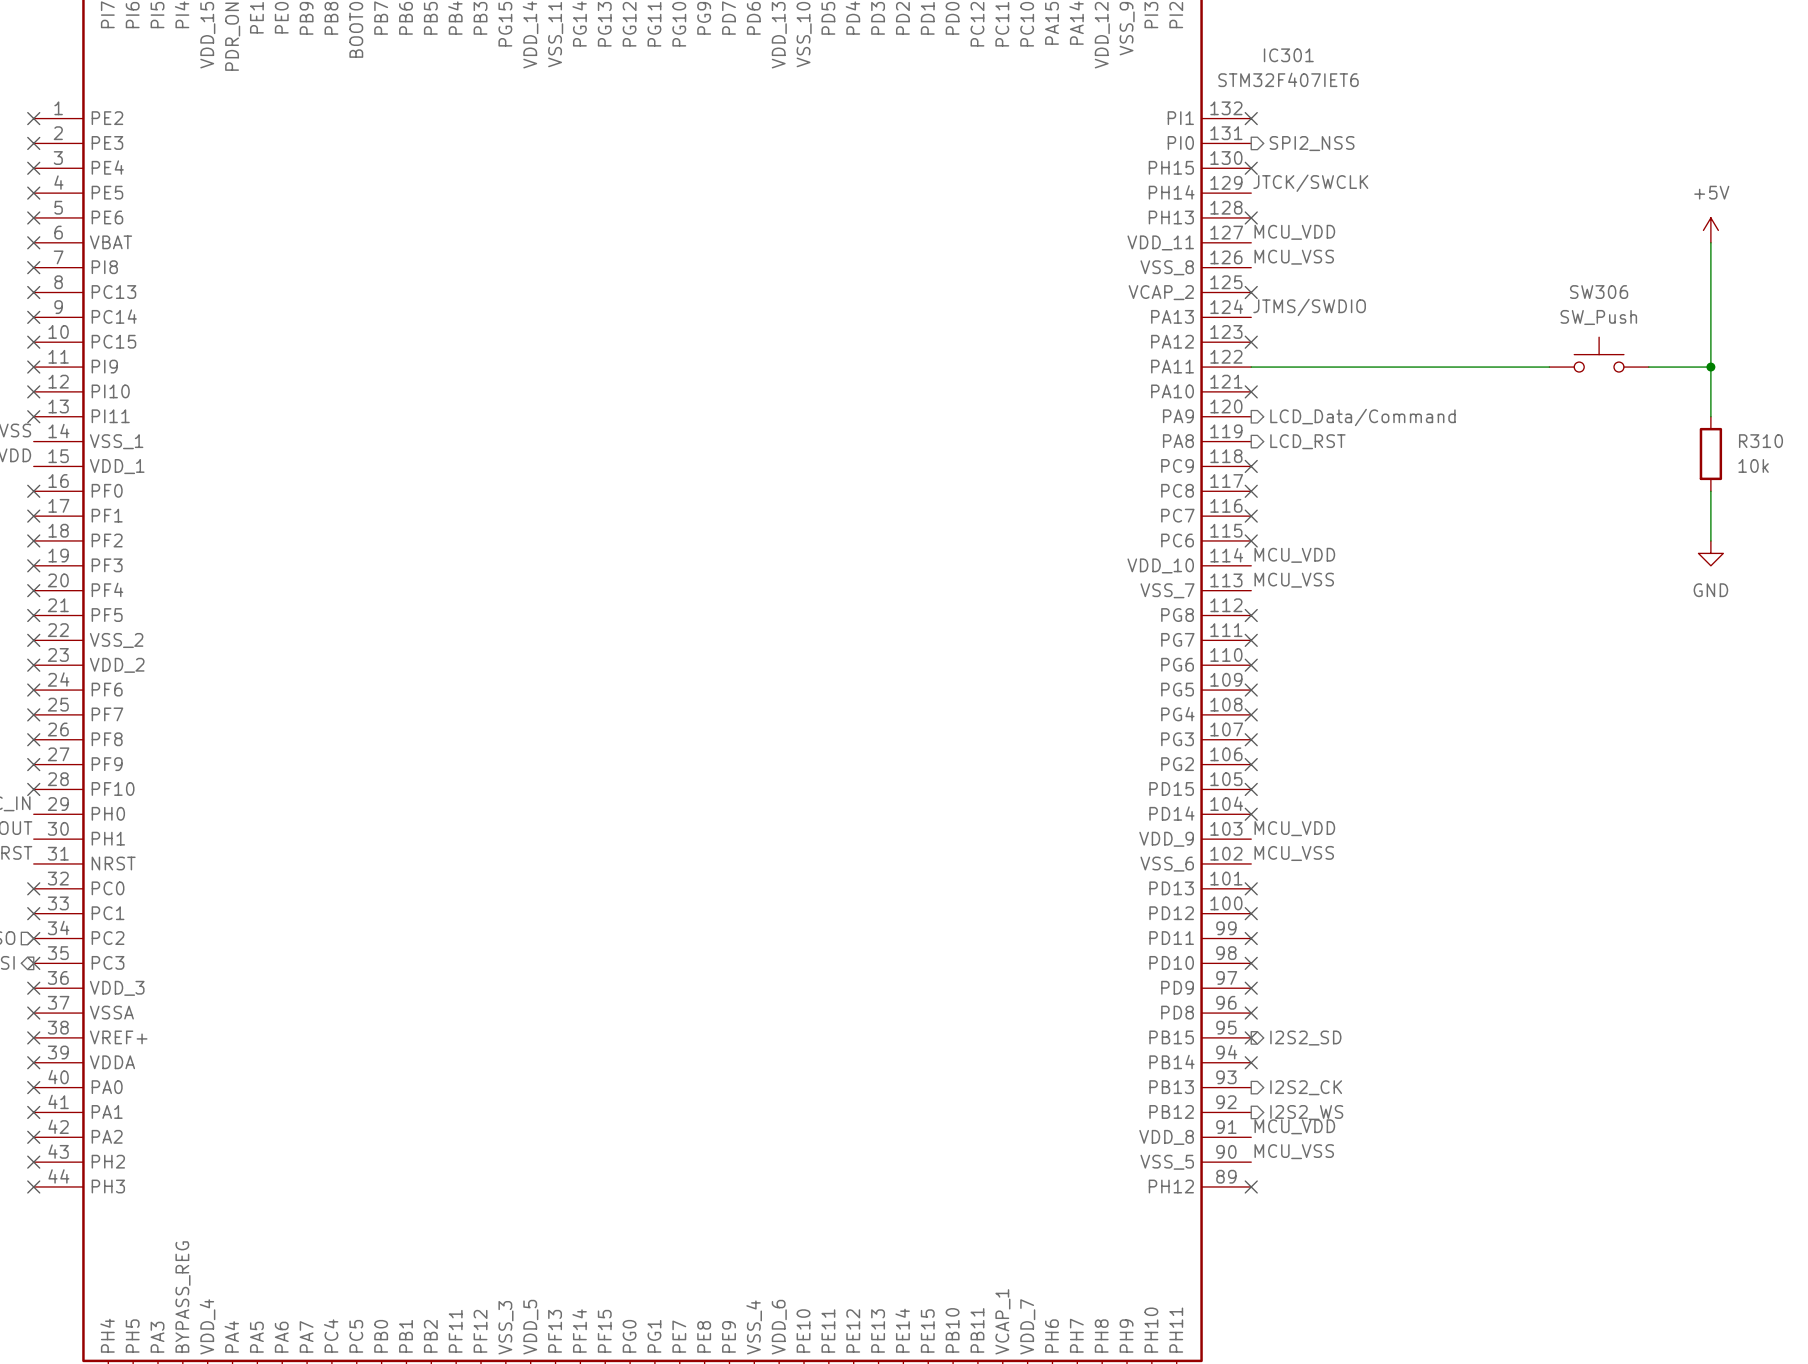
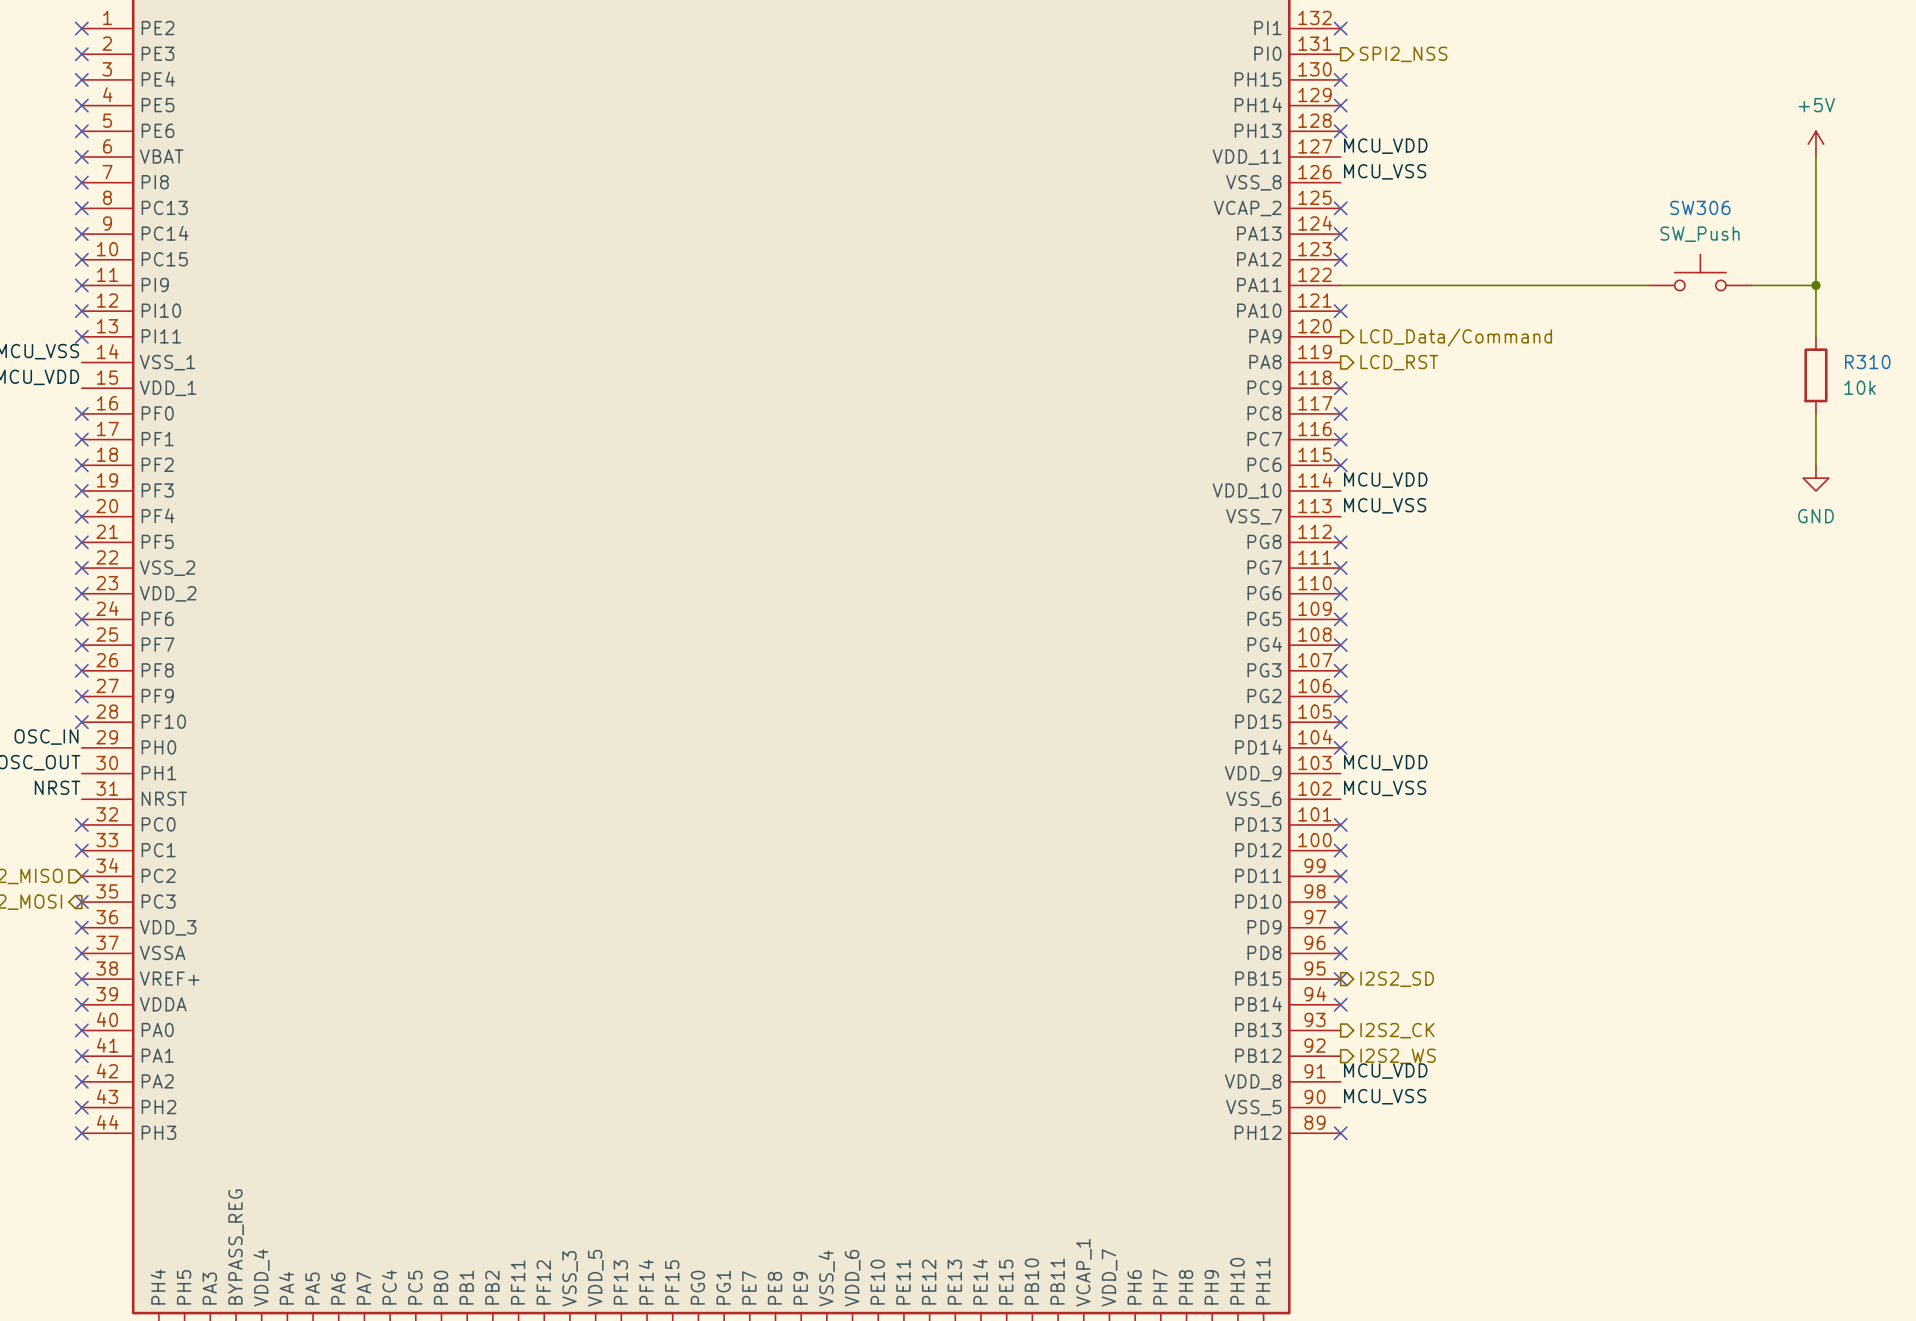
label: JTCK/SWCLK (1310, 183) -> none
no-connect mark: none -> (1340, 105)
label: JTMS/SWDIO (1309, 307) -> none
no-connect mark: none -> (1340, 234)

